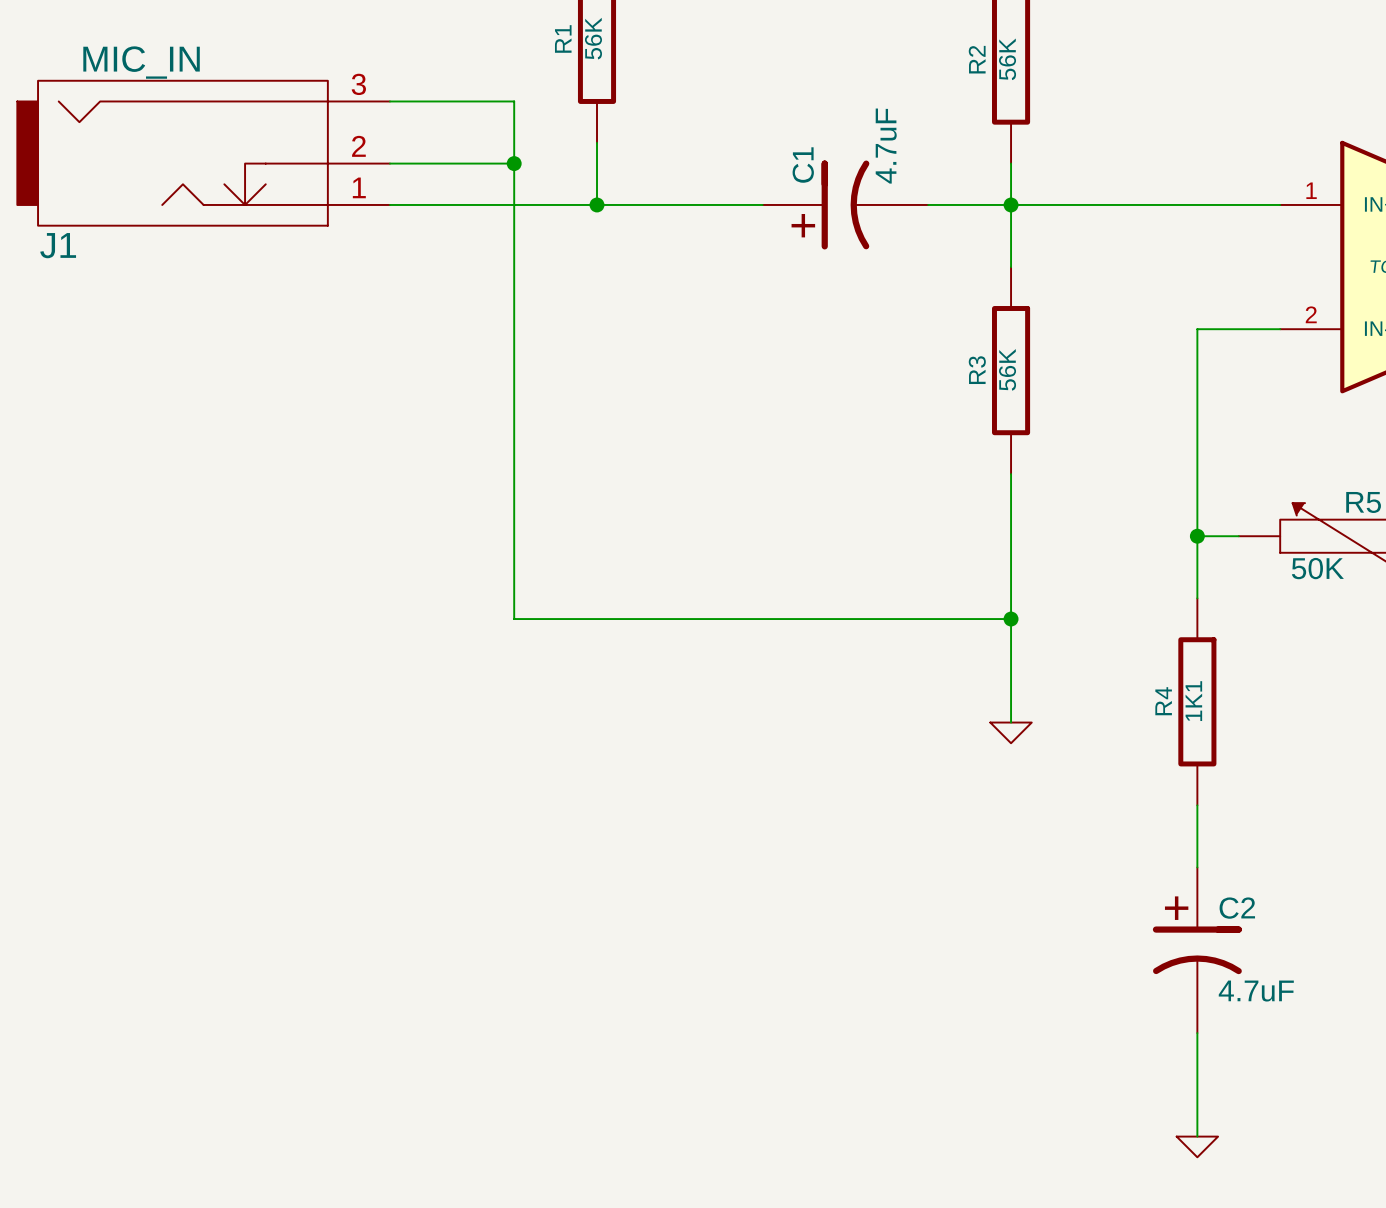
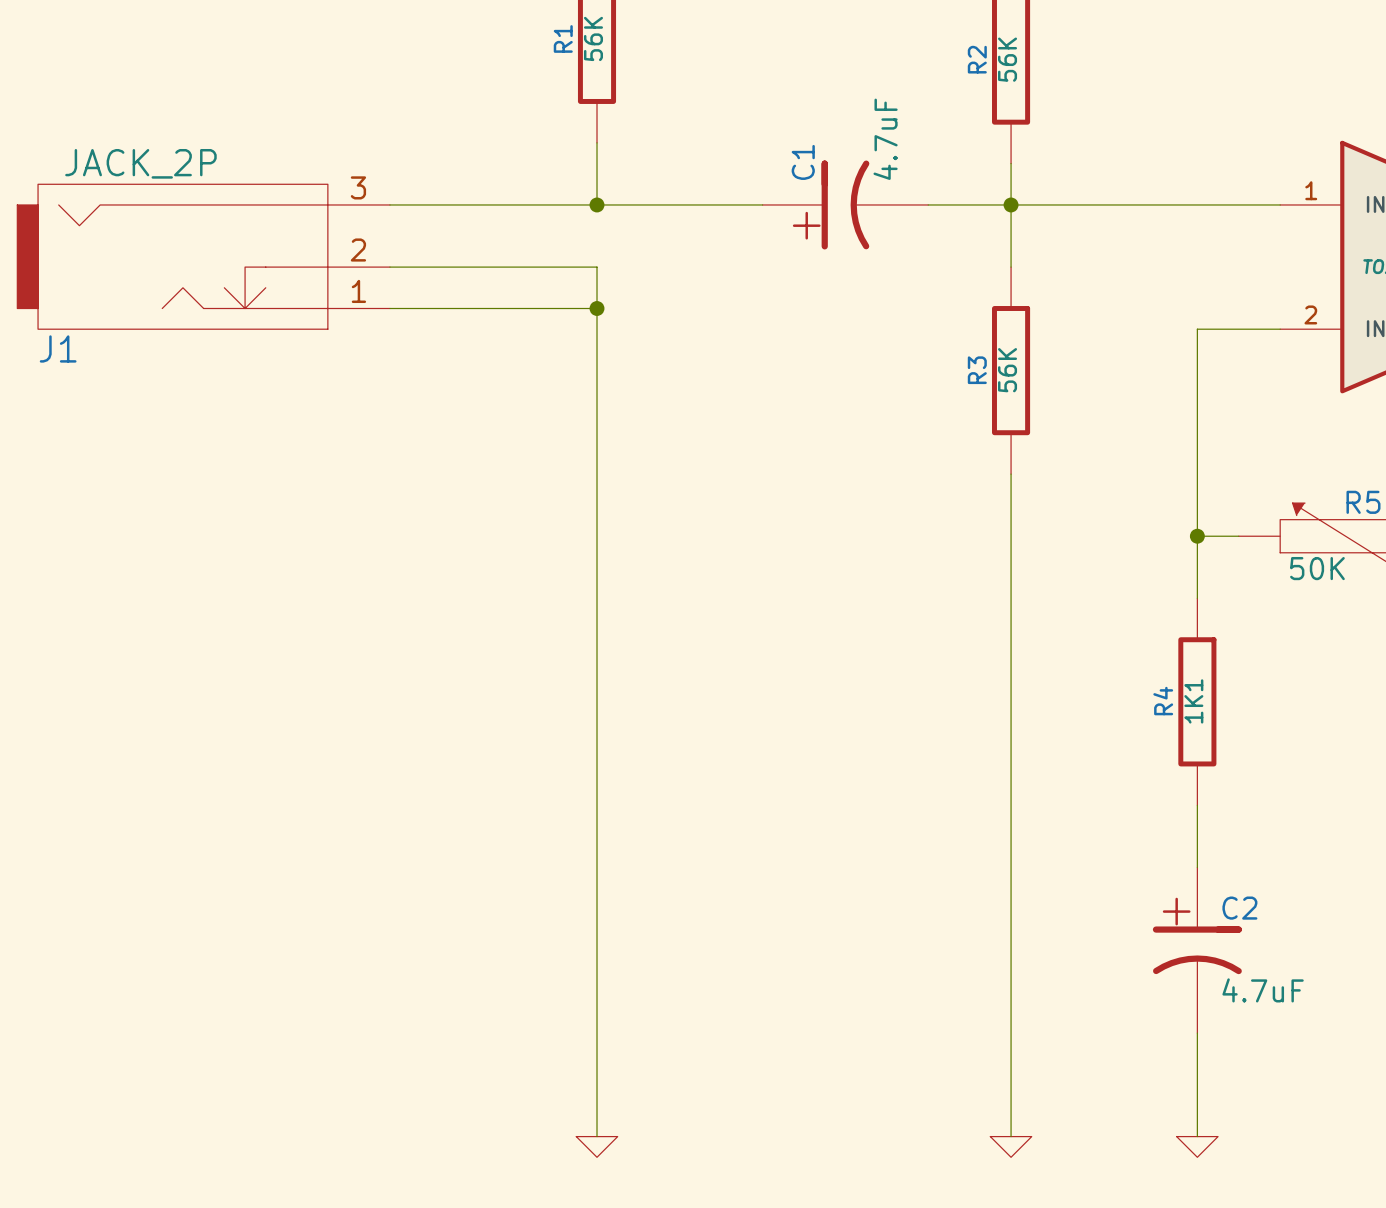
J1 value: MIC_IN (141, 62) -> JACK_2P (140, 163)
wire: (389, 101) (514, 101) (514, 619) (1011, 619) -> none
J1 position: (203, 153) -> (203, 256)
wire: (389, 163) (514, 163) -> none
junction: (514, 163) -> none
wire: none -> (389, 267) (597, 267) (597, 1136)
wire: none -> (389, 308) (597, 308)
junction: none -> (597, 308)
junction: (1011, 619) -> none
wire: none -> (1011, 722) (1011, 1136)
power symbol: (1011, 732) -> none
power symbol: none -> (597, 1146)
power symbol: none -> (1011, 1146)

